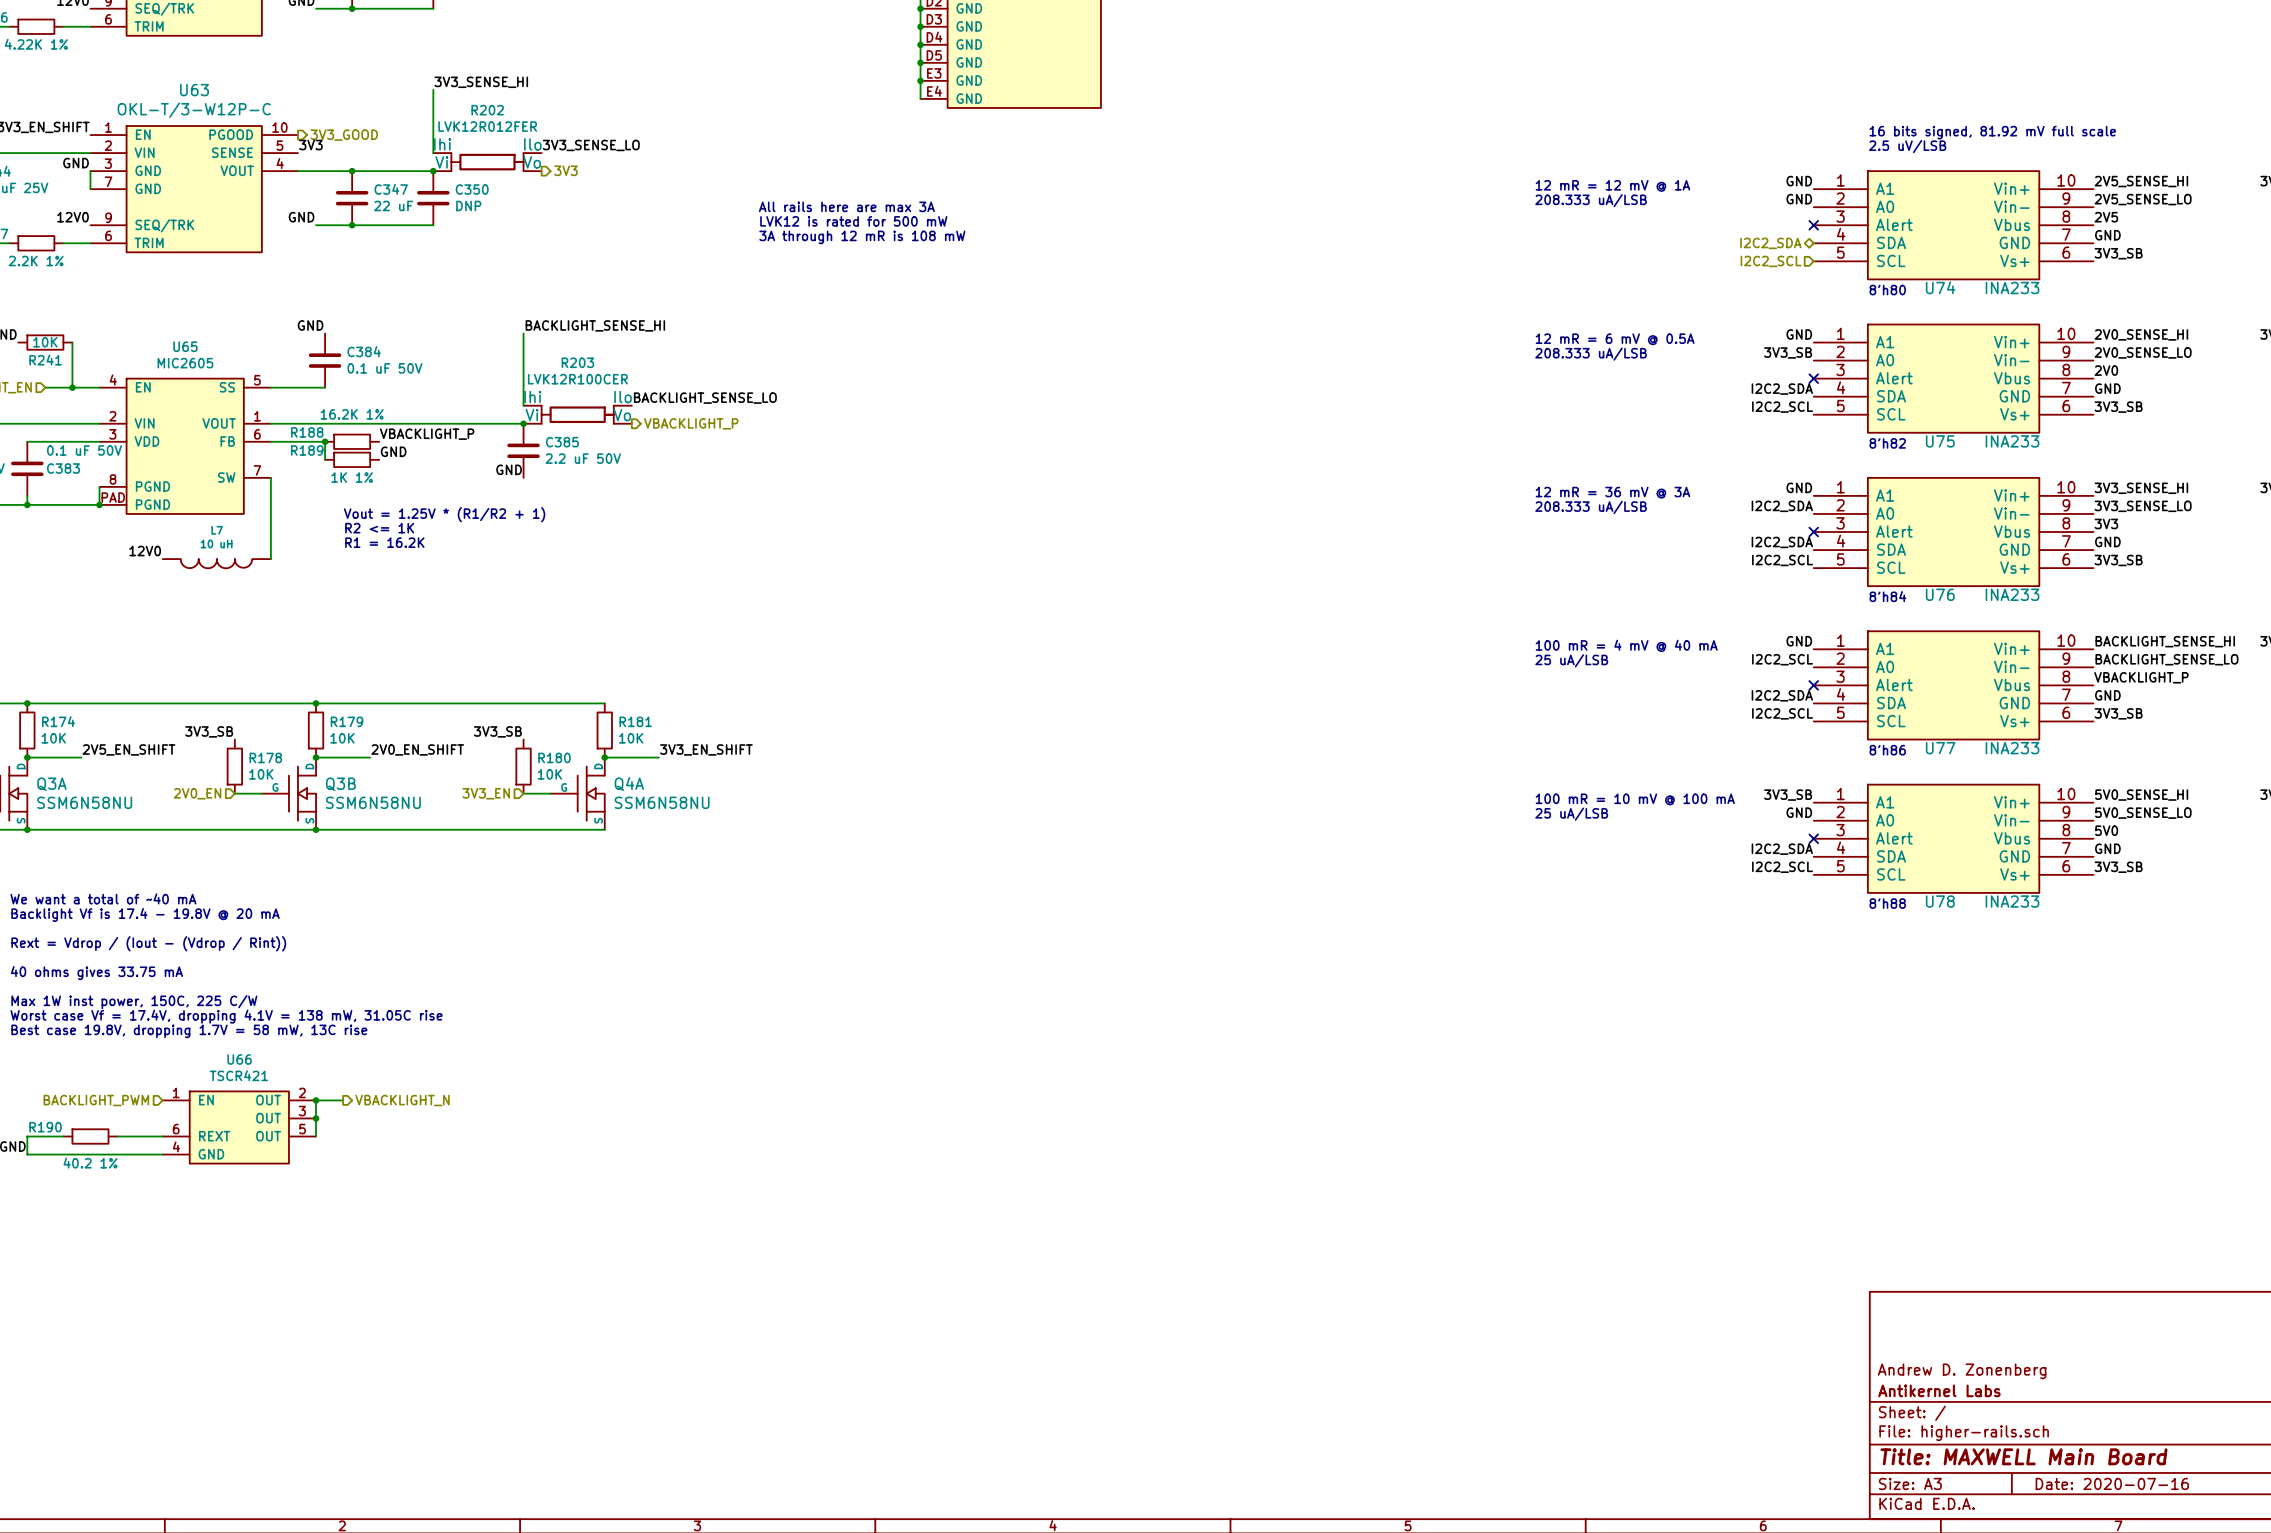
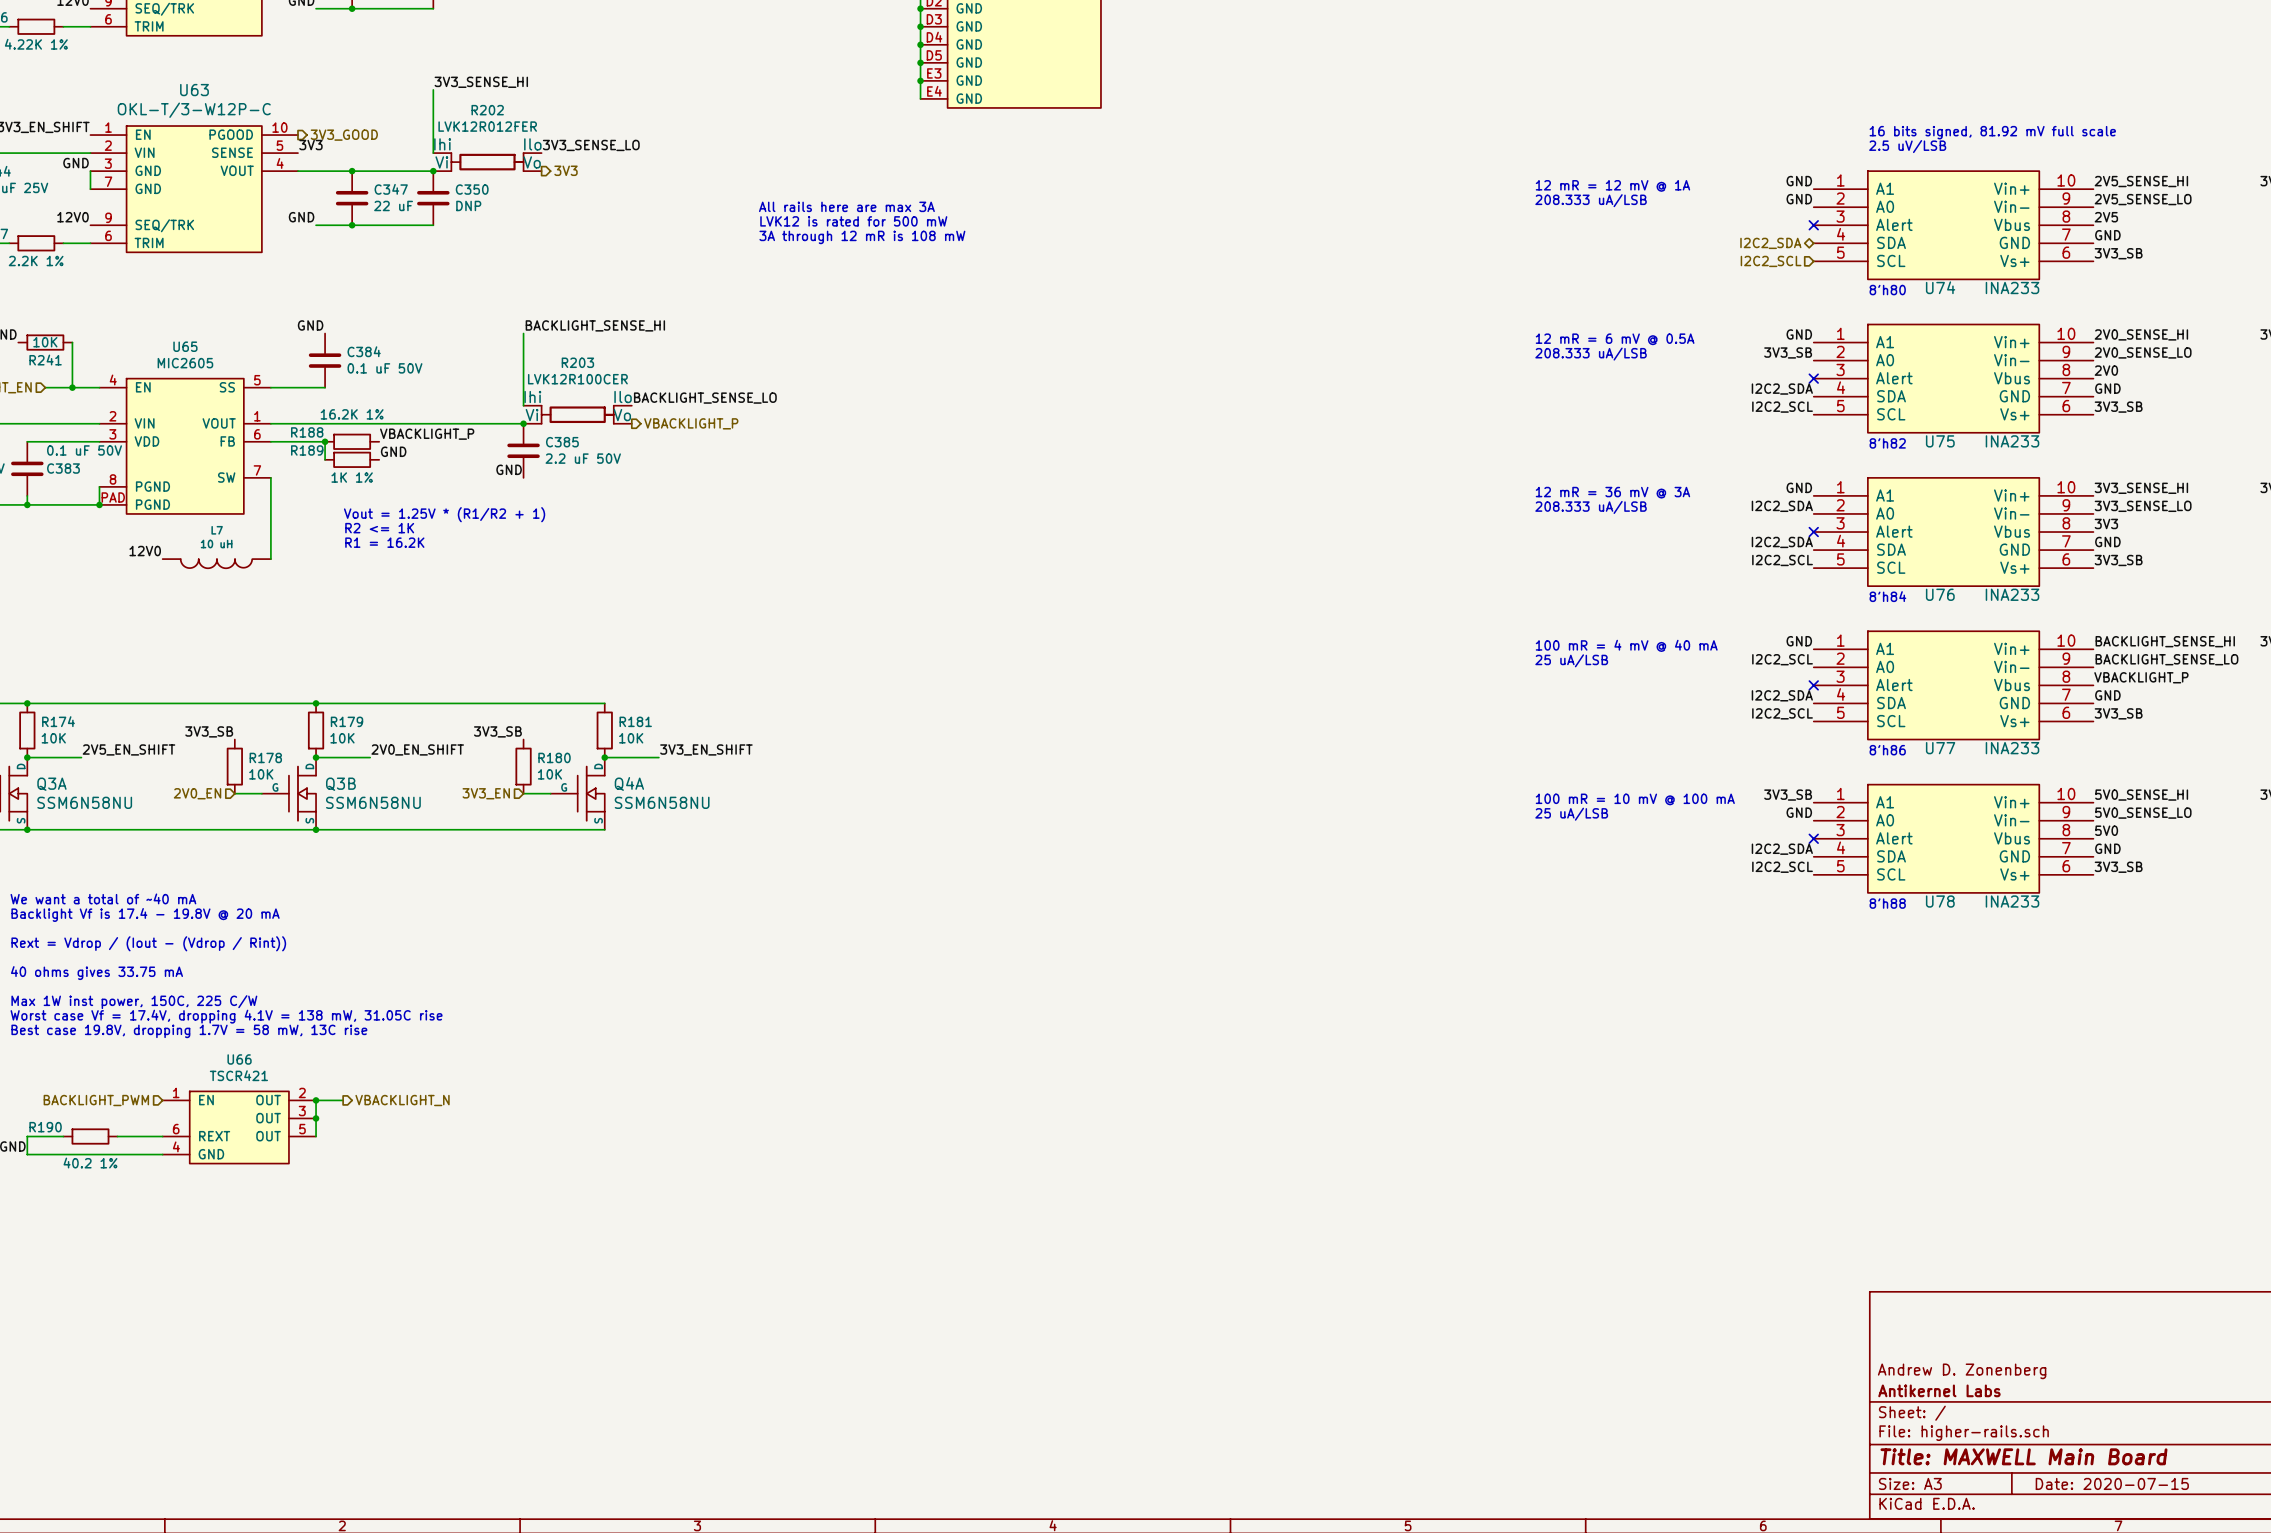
title block: Date: 2020-07-16 (2112, 1483) -> Date: 2020-07-15 (2112, 1483)

